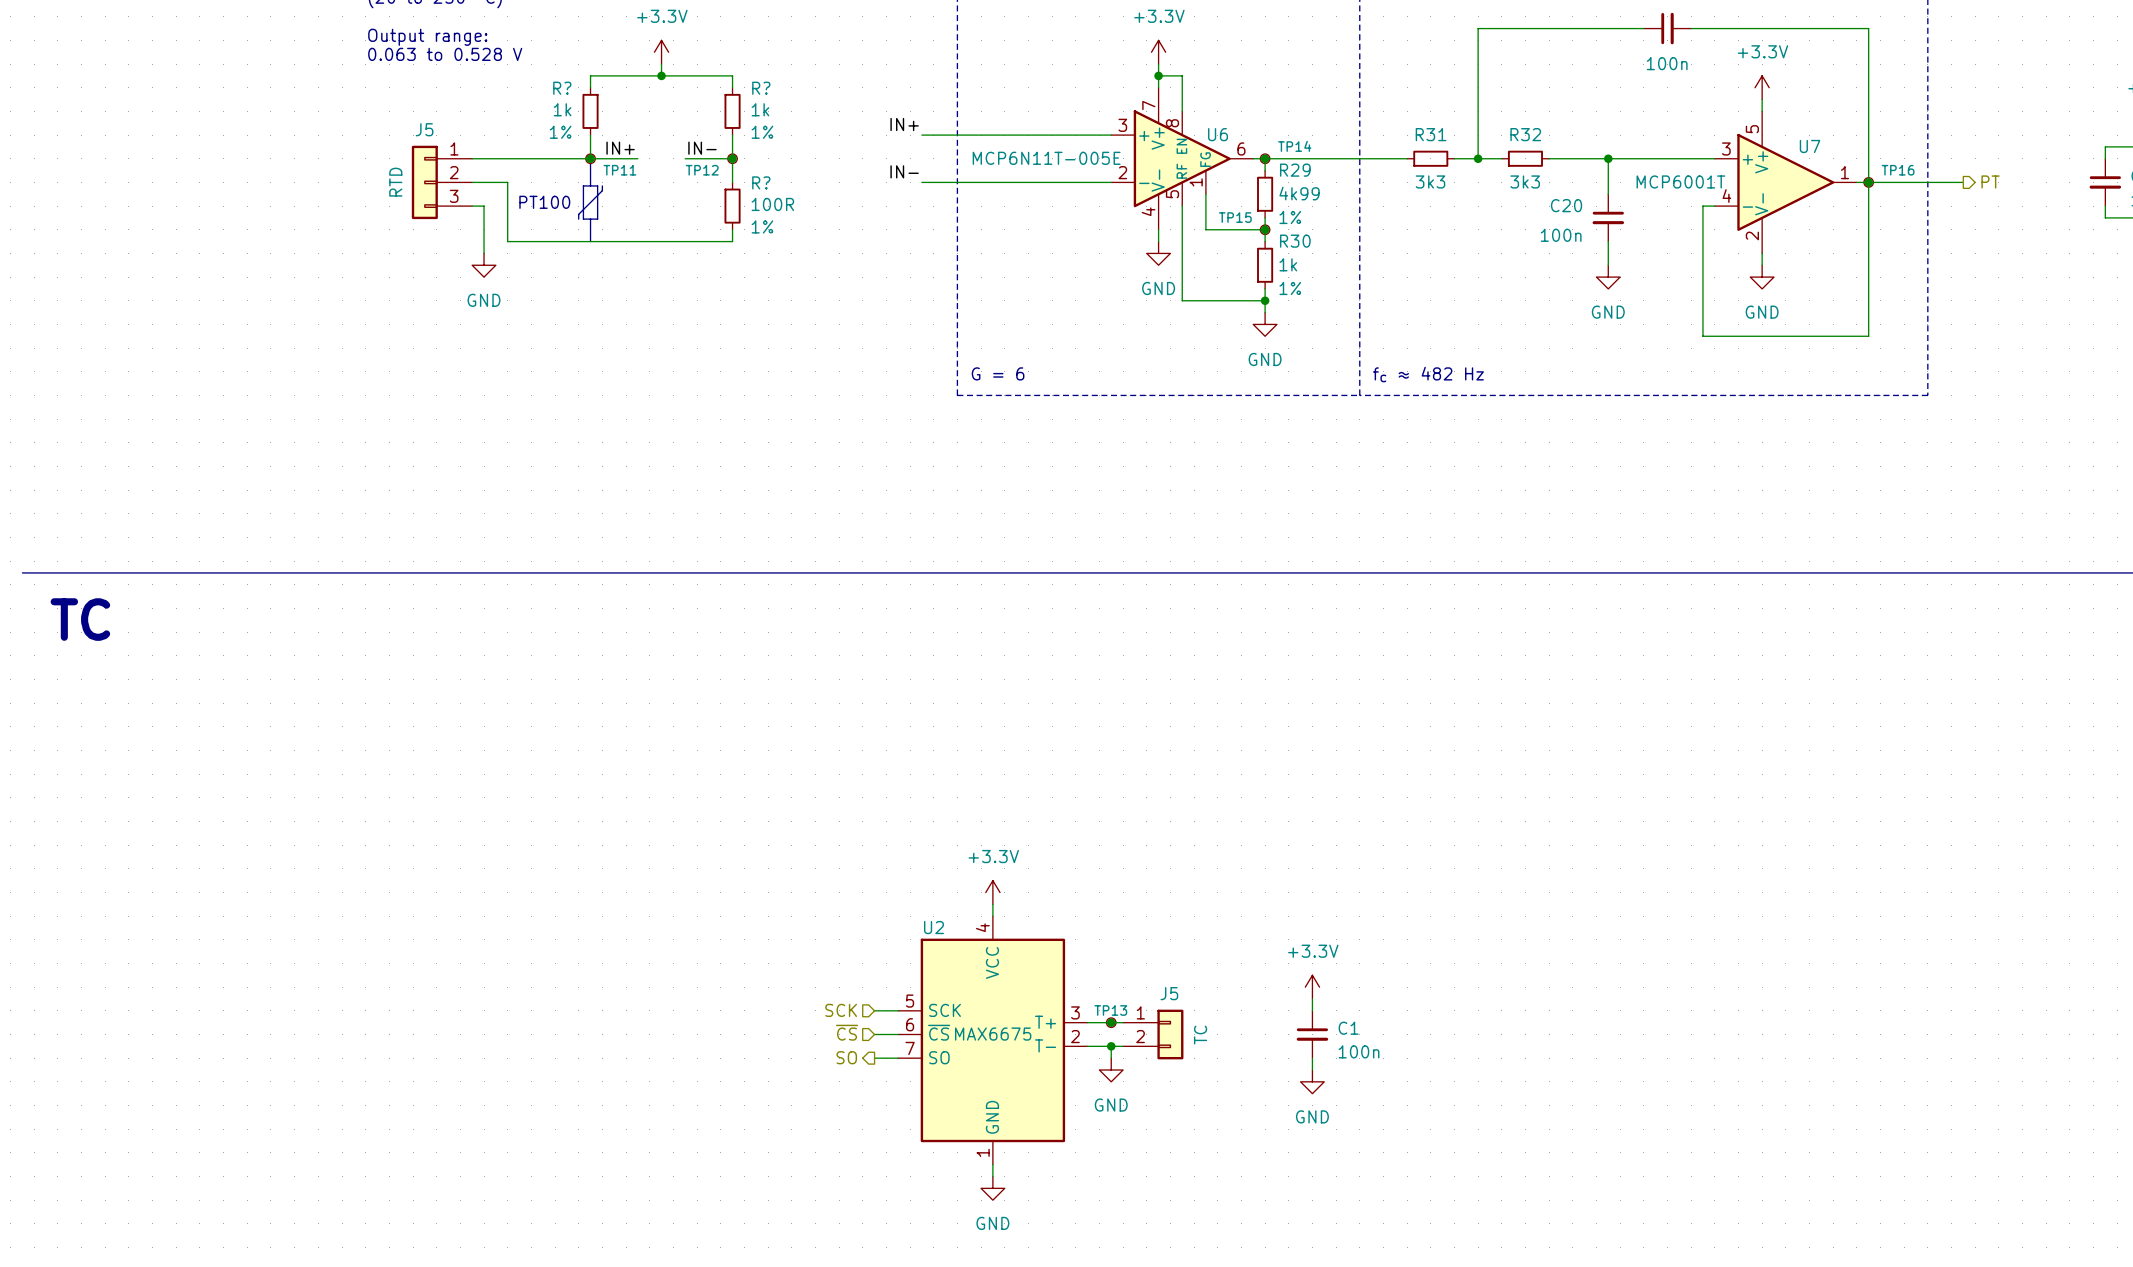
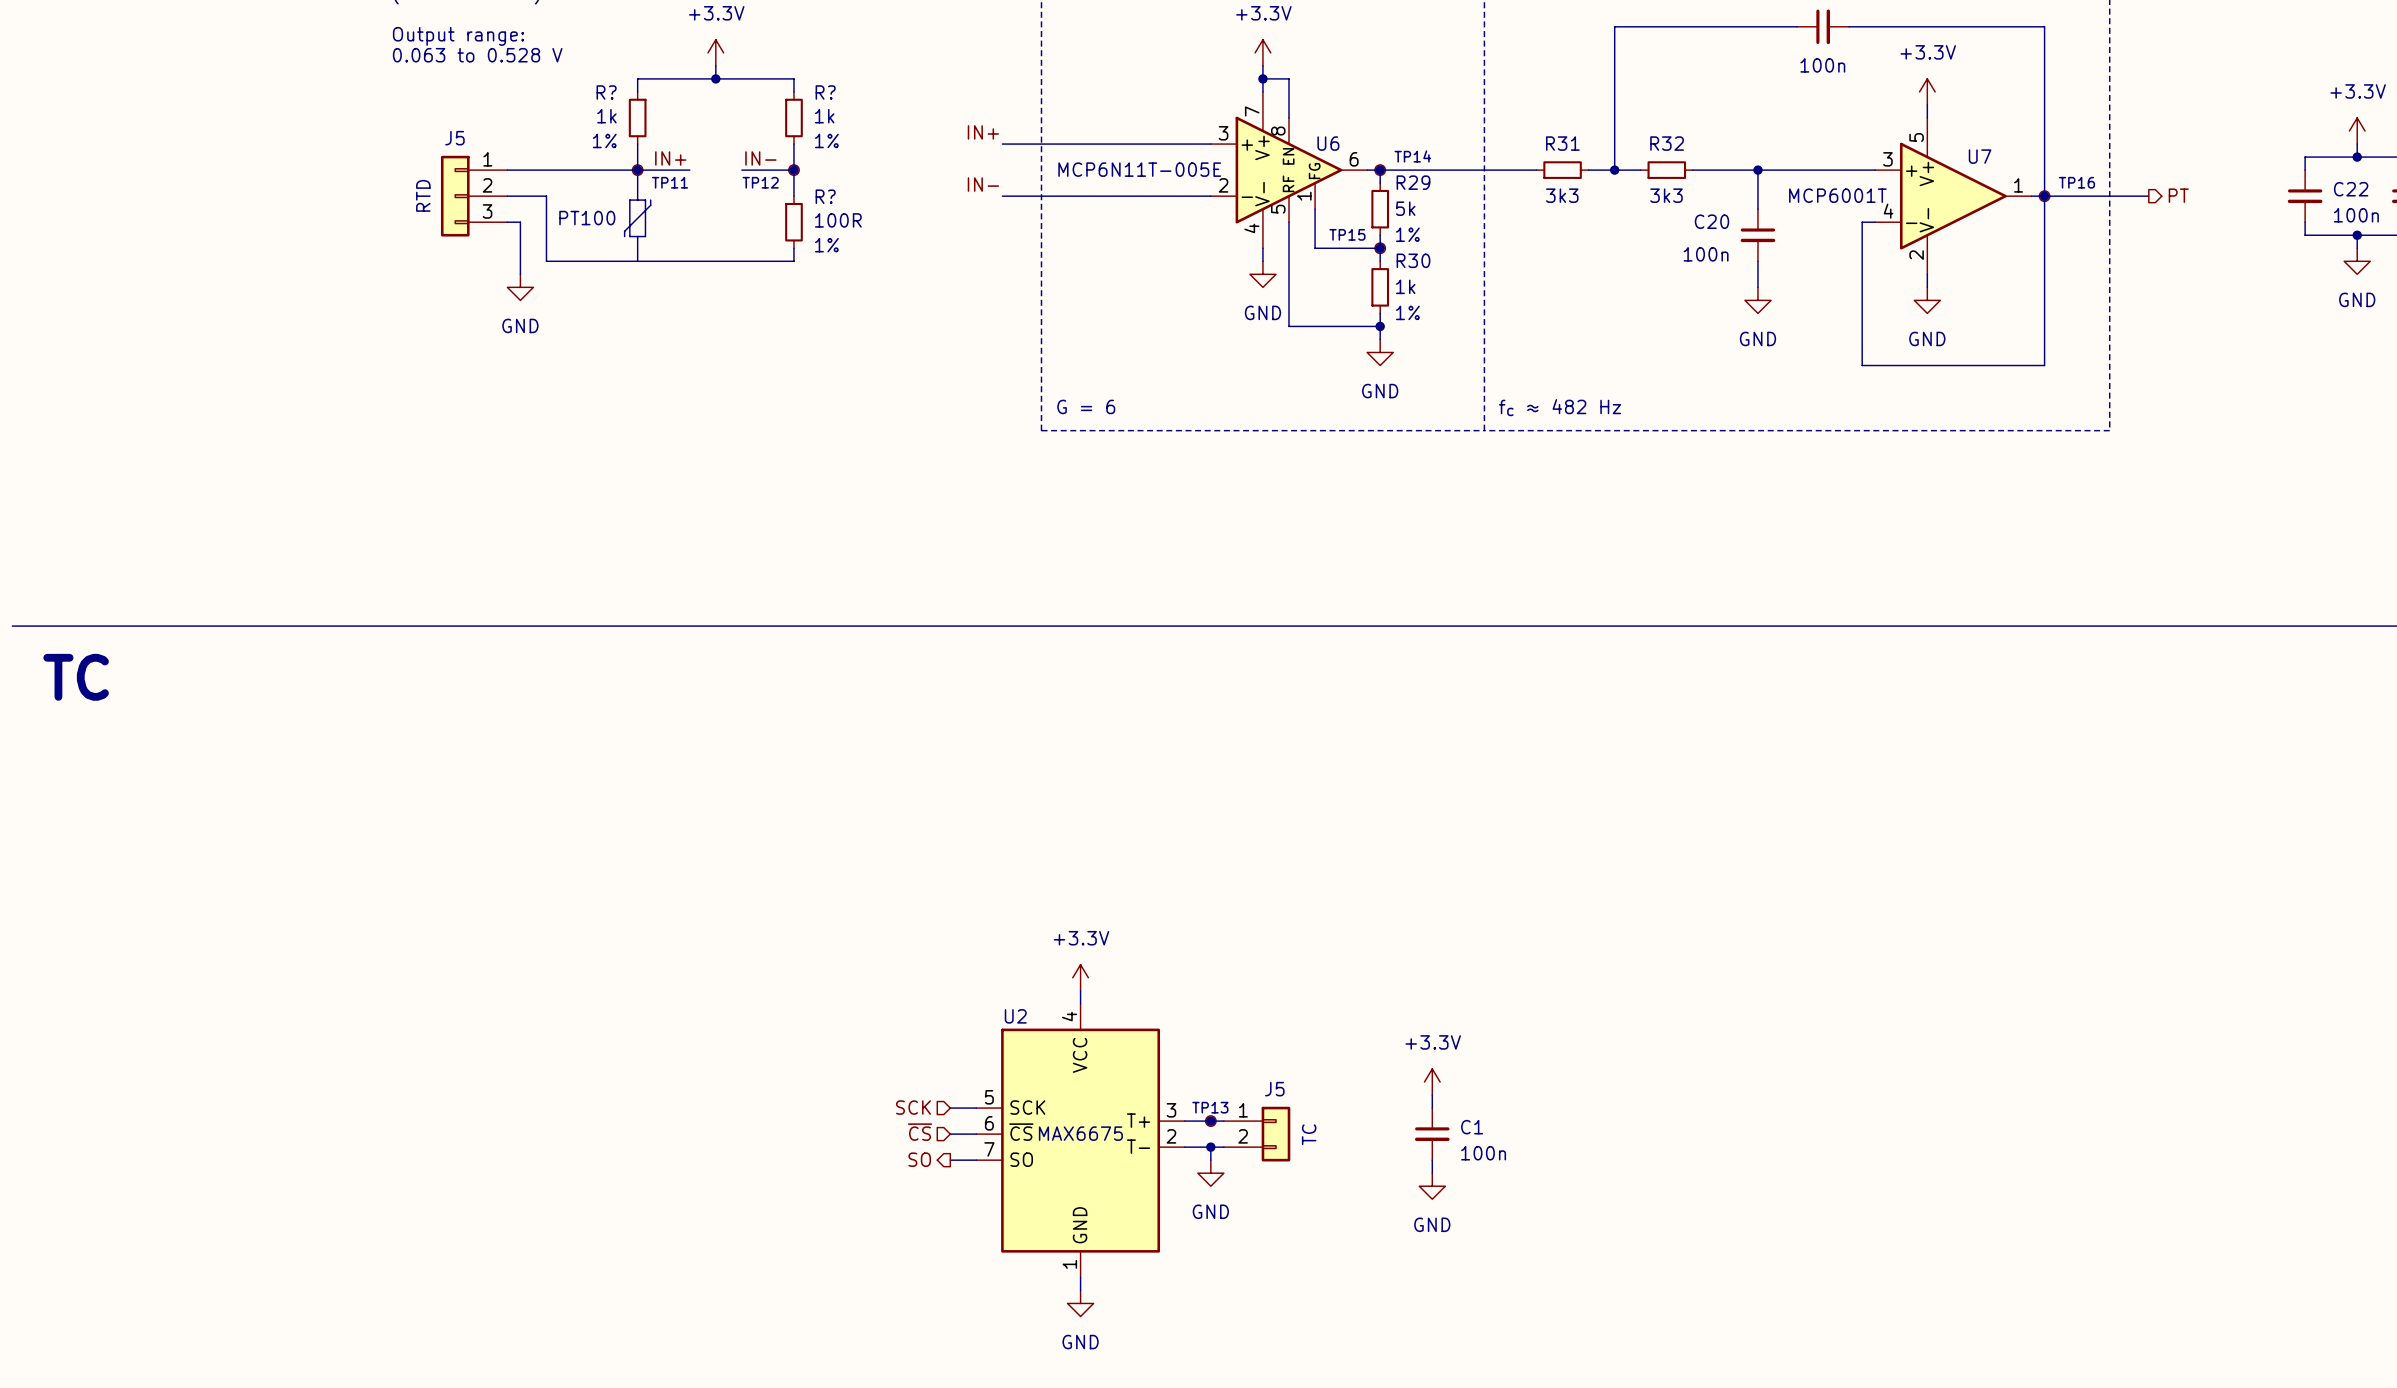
R29 value: 4k99 (1299, 193) -> 5k (1405, 208)

